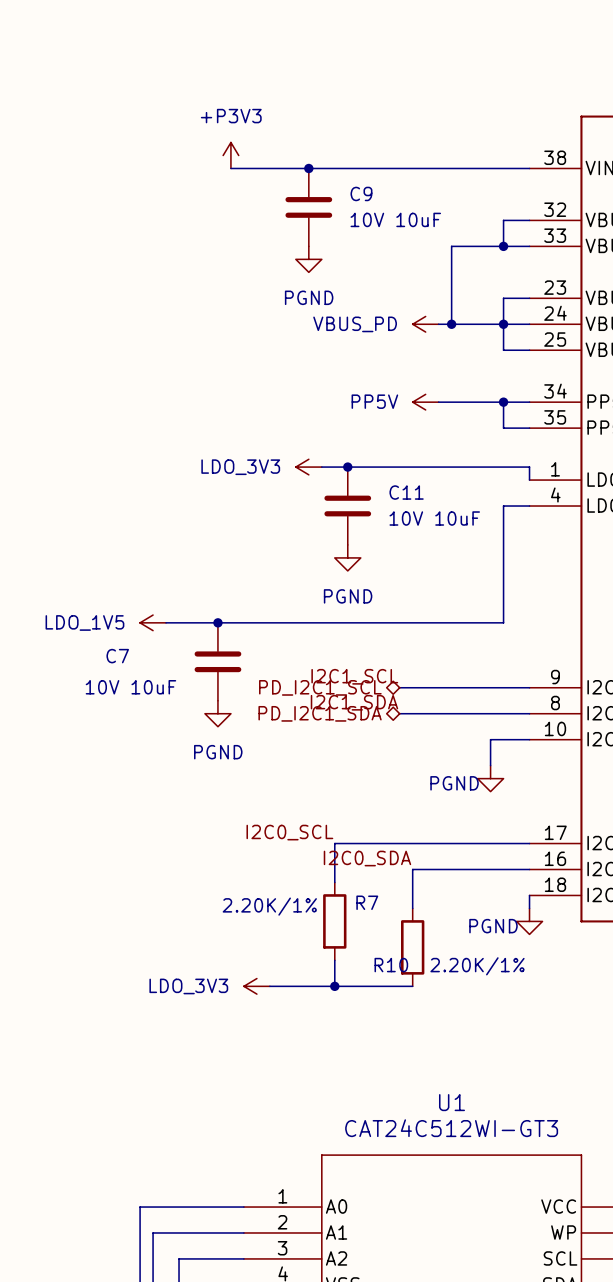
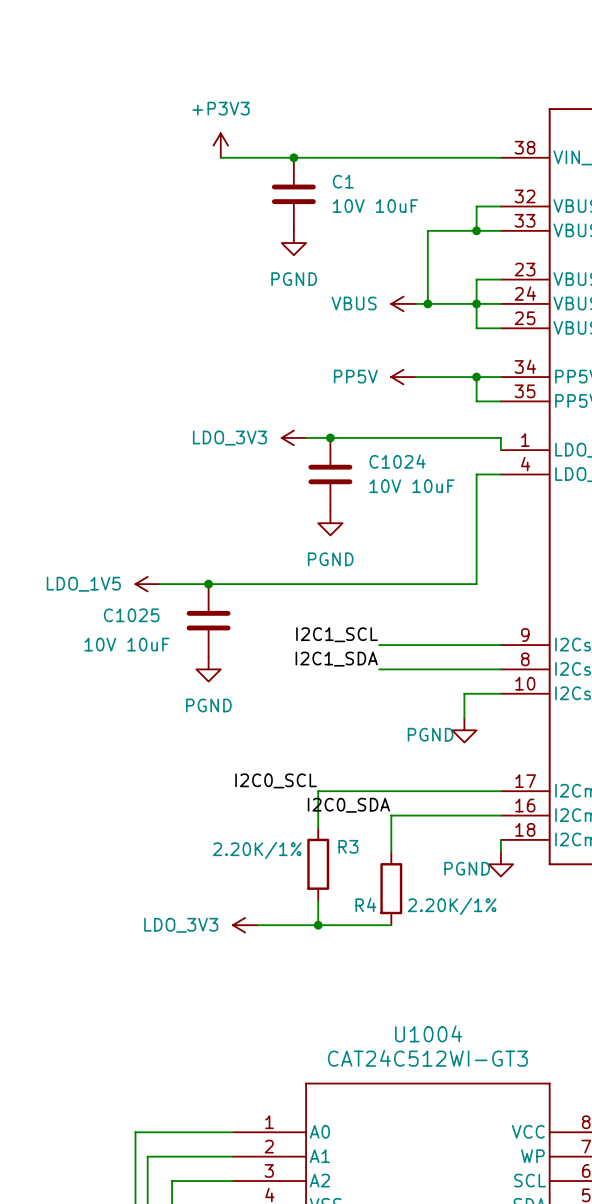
C9 name: C9 (361, 193) -> C1 (343, 181)
power symbol: VBUS_PD (425, 324) -> VBUS (403, 303)
C11 name: C11 (406, 492) -> C1024 (397, 461)
C7 name: C7 (117, 656) -> C1025 (131, 615)
hierarchical label: PD_I2C1_SCL (320, 687) -> none
hierarchical label: PD_I2C1_SDA (320, 713) -> none
R7 name: R7 (367, 902) -> R3 (348, 846)
R10 name: R10 (391, 965) -> R4 (365, 904)
U1 name: U1 (452, 1102) -> U1004 (428, 1033)

